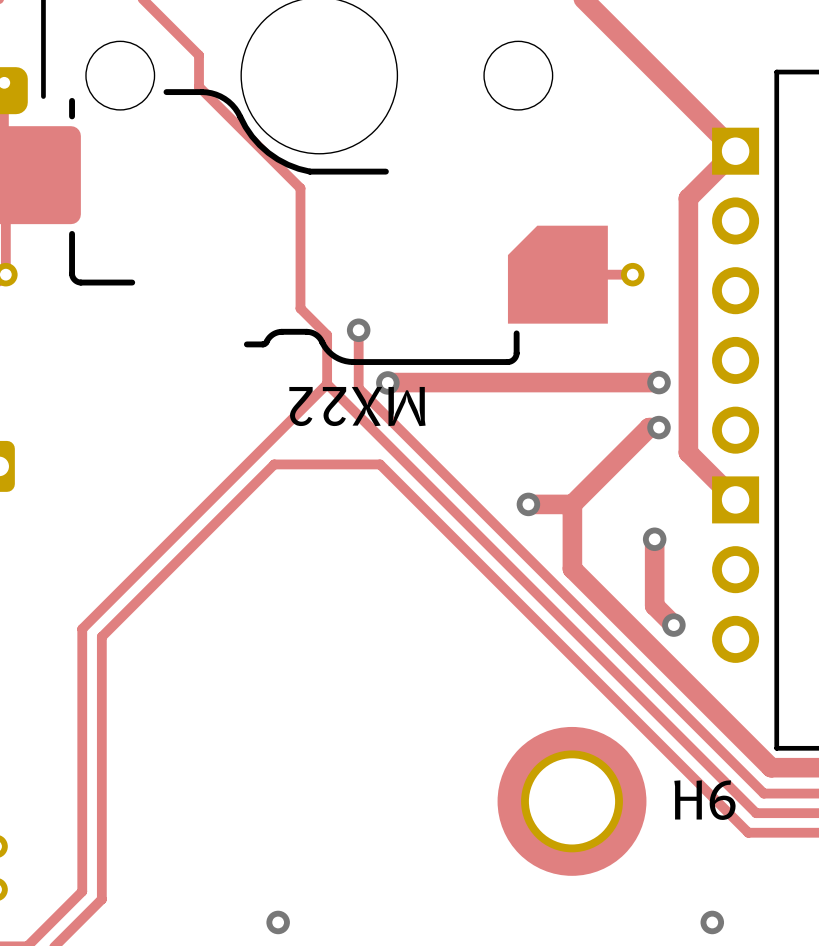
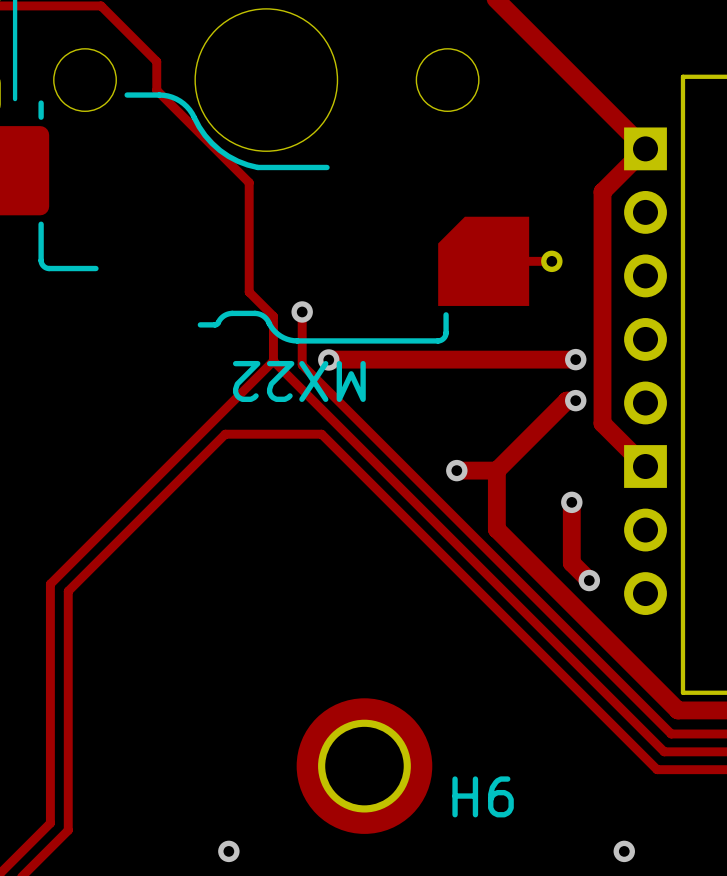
H6 name position: H6 (704, 800) -> H6 (483, 796)
H6 position: (572, 801) -> (364, 766)

